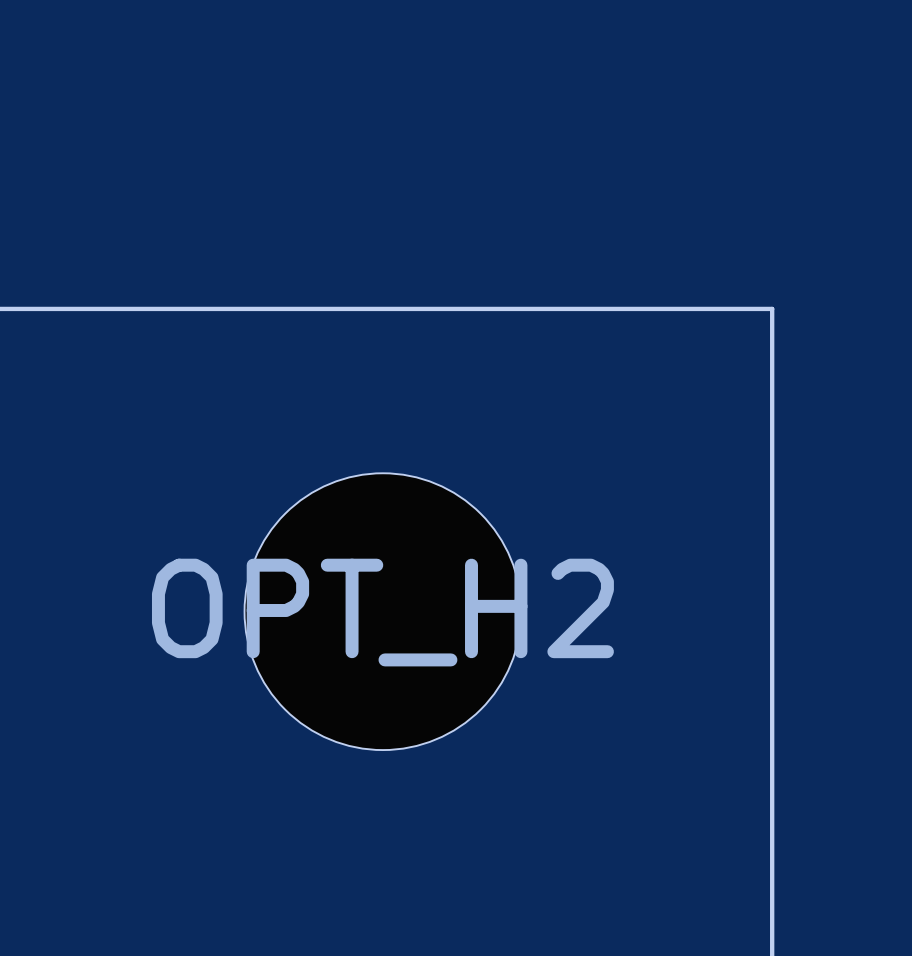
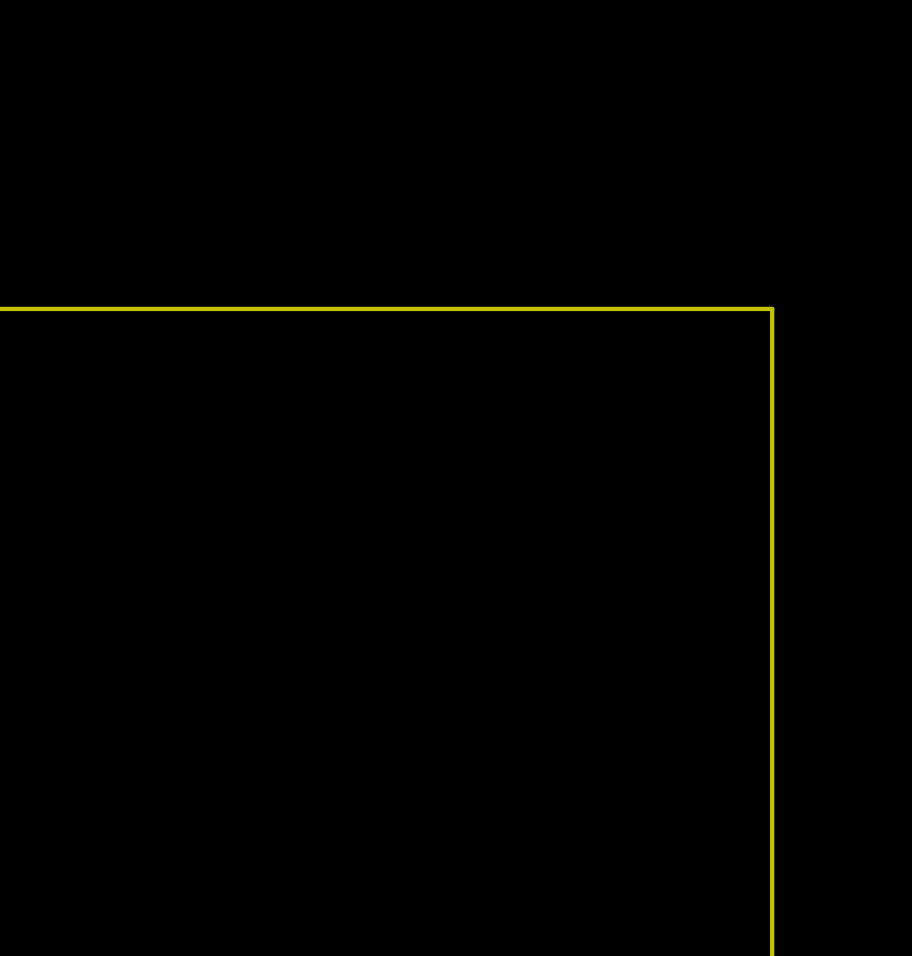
OPT_H2: (382, 611) -> none

